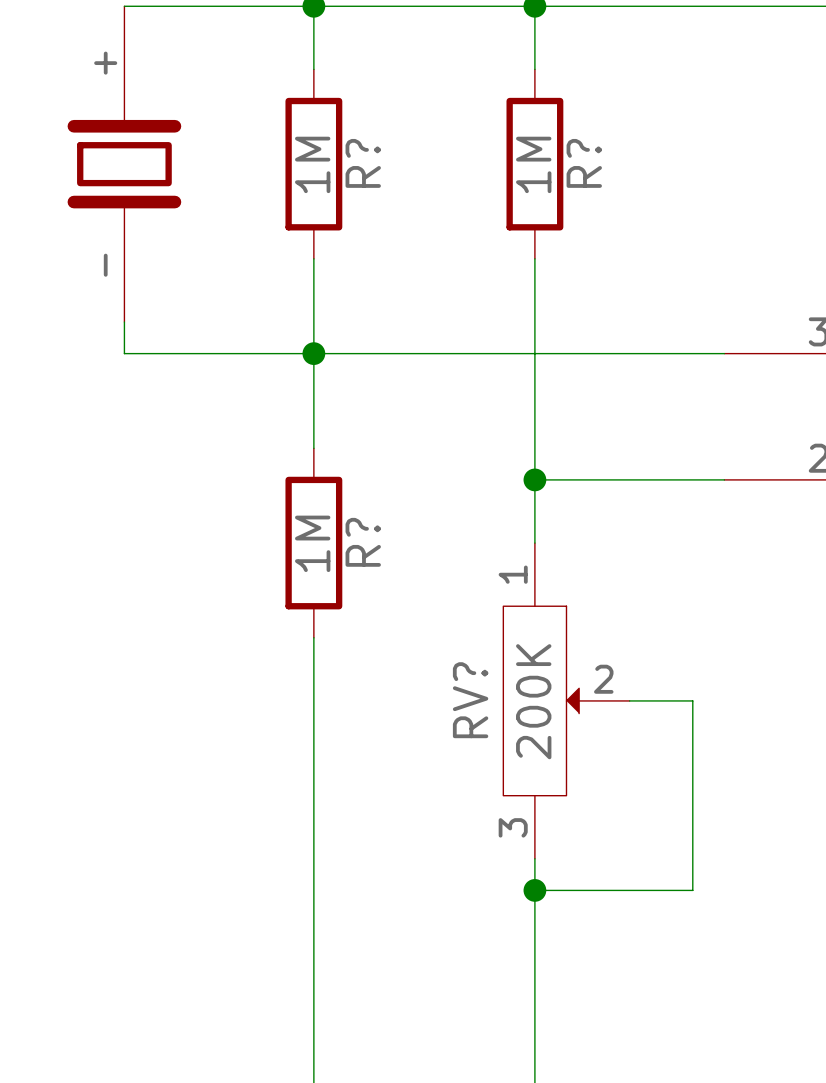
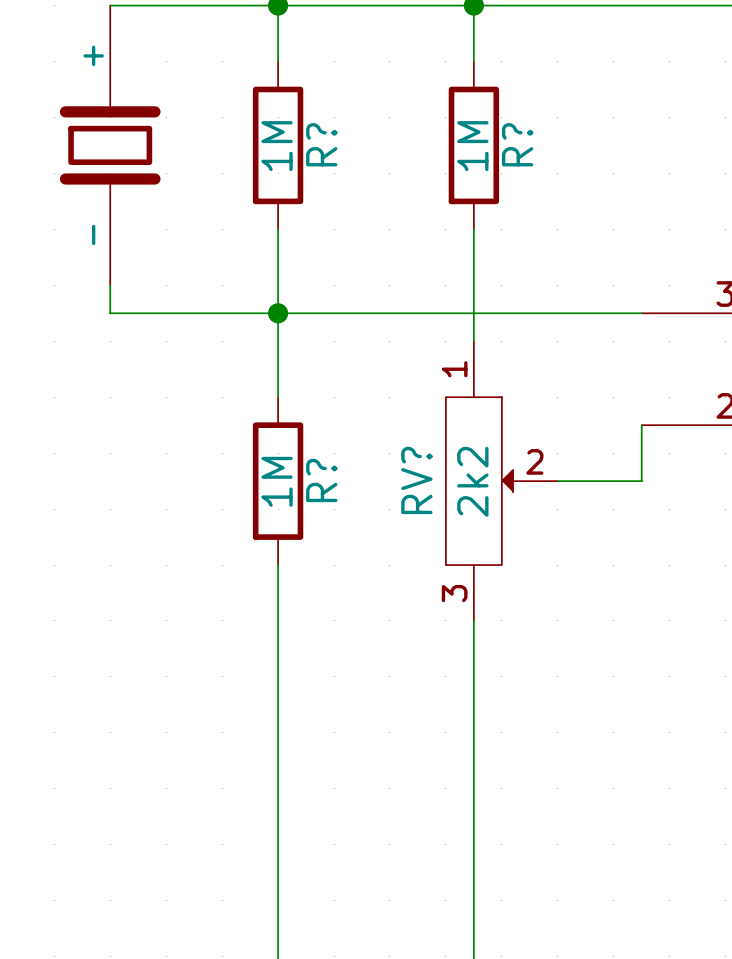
wire: (534, 385) (534, 543) -> (473, 620) (473, 760)
wire: (534, 479) (724, 479) -> (557, 481) (641, 481) (641, 425)
junction: (534, 479) -> none
RV?: none -> 2k2 (501, 481)
RV?: 200K (566, 700) -> none
wire: (629, 700) (692, 700) (692, 890) (534, 890) -> none
junction: (534, 890) -> none

